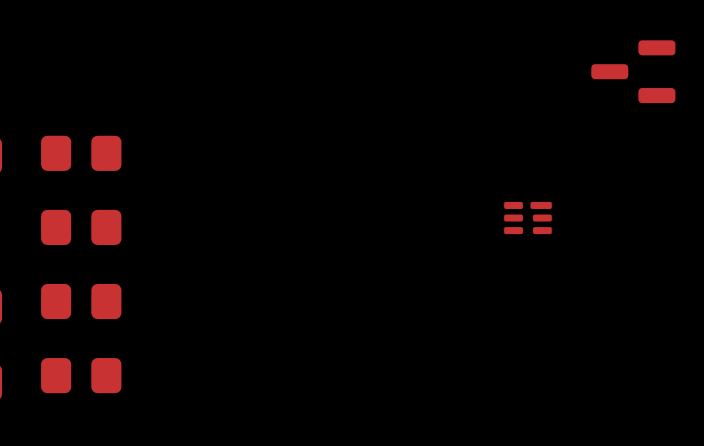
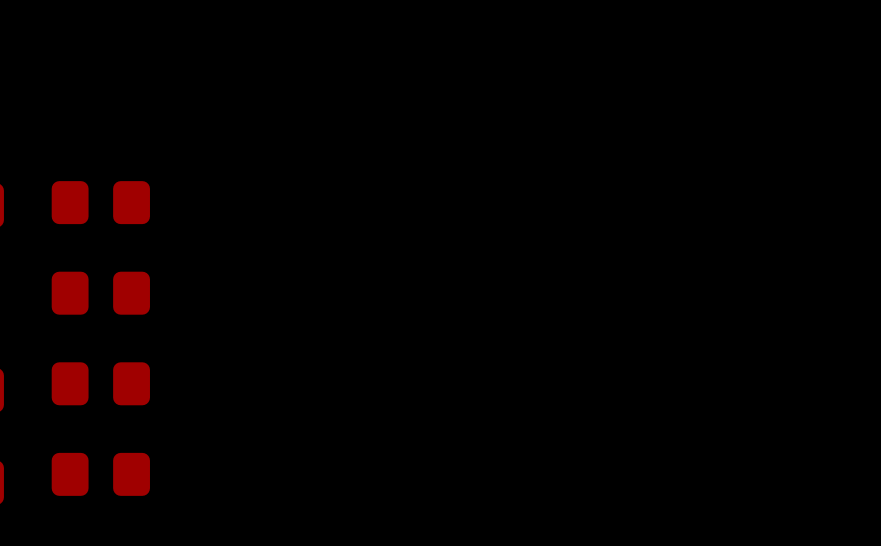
part: (633, 71) -> none
part: (527, 218) -> none

